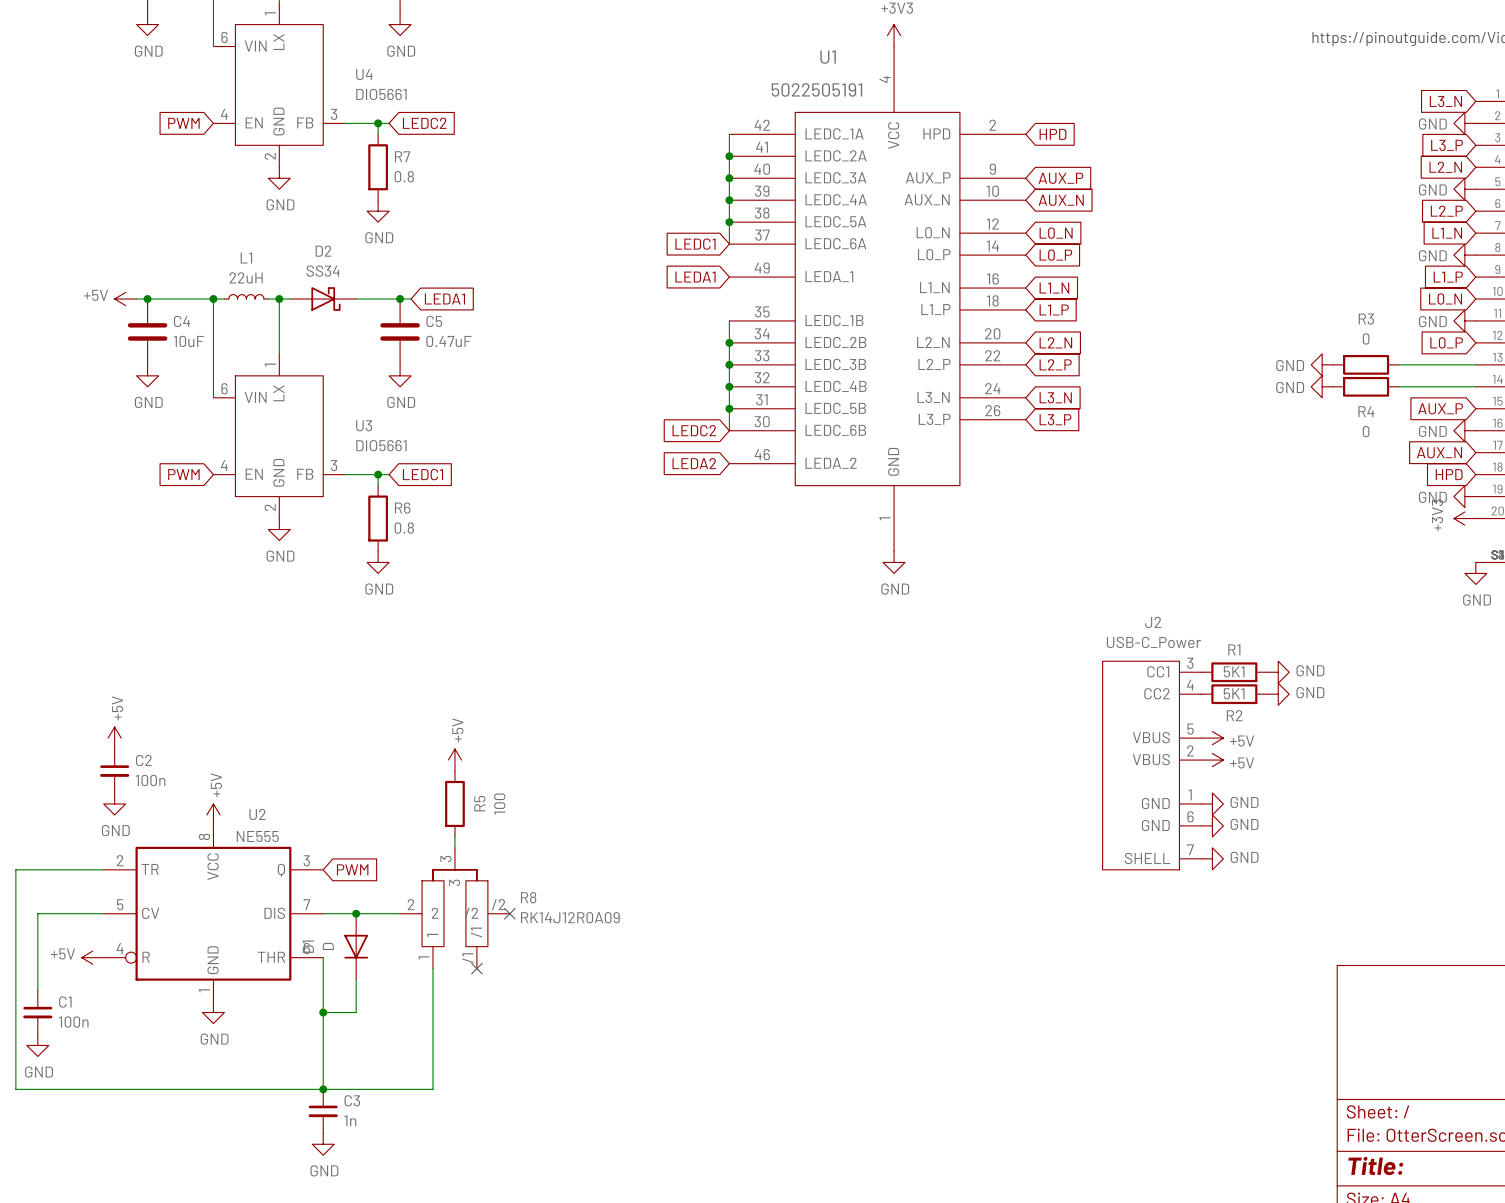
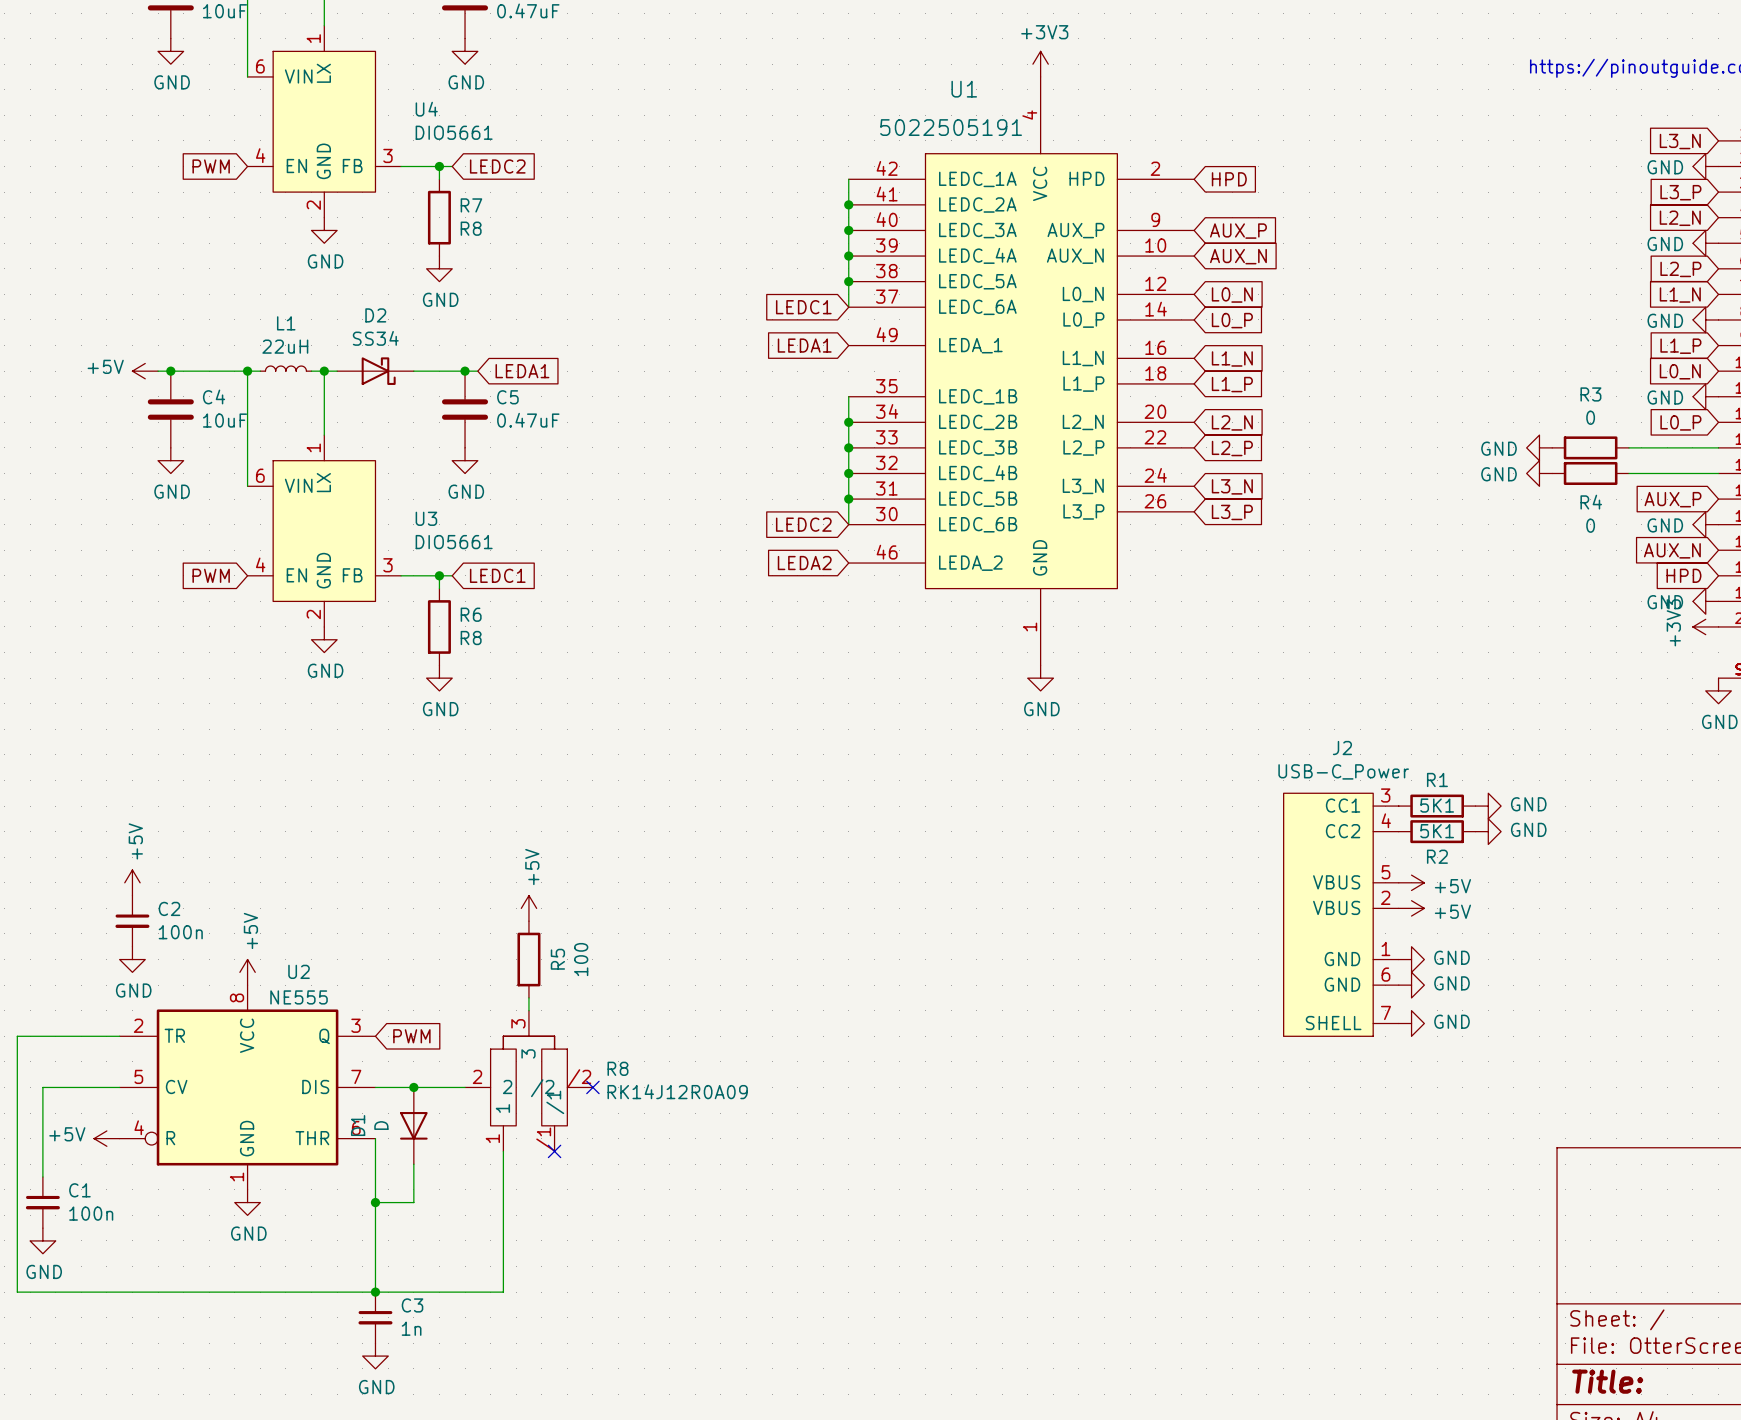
R7 value: 0.8 (404, 176) -> R8 (471, 228)
R6 value: 0.8 (404, 528) -> R8 (471, 638)

